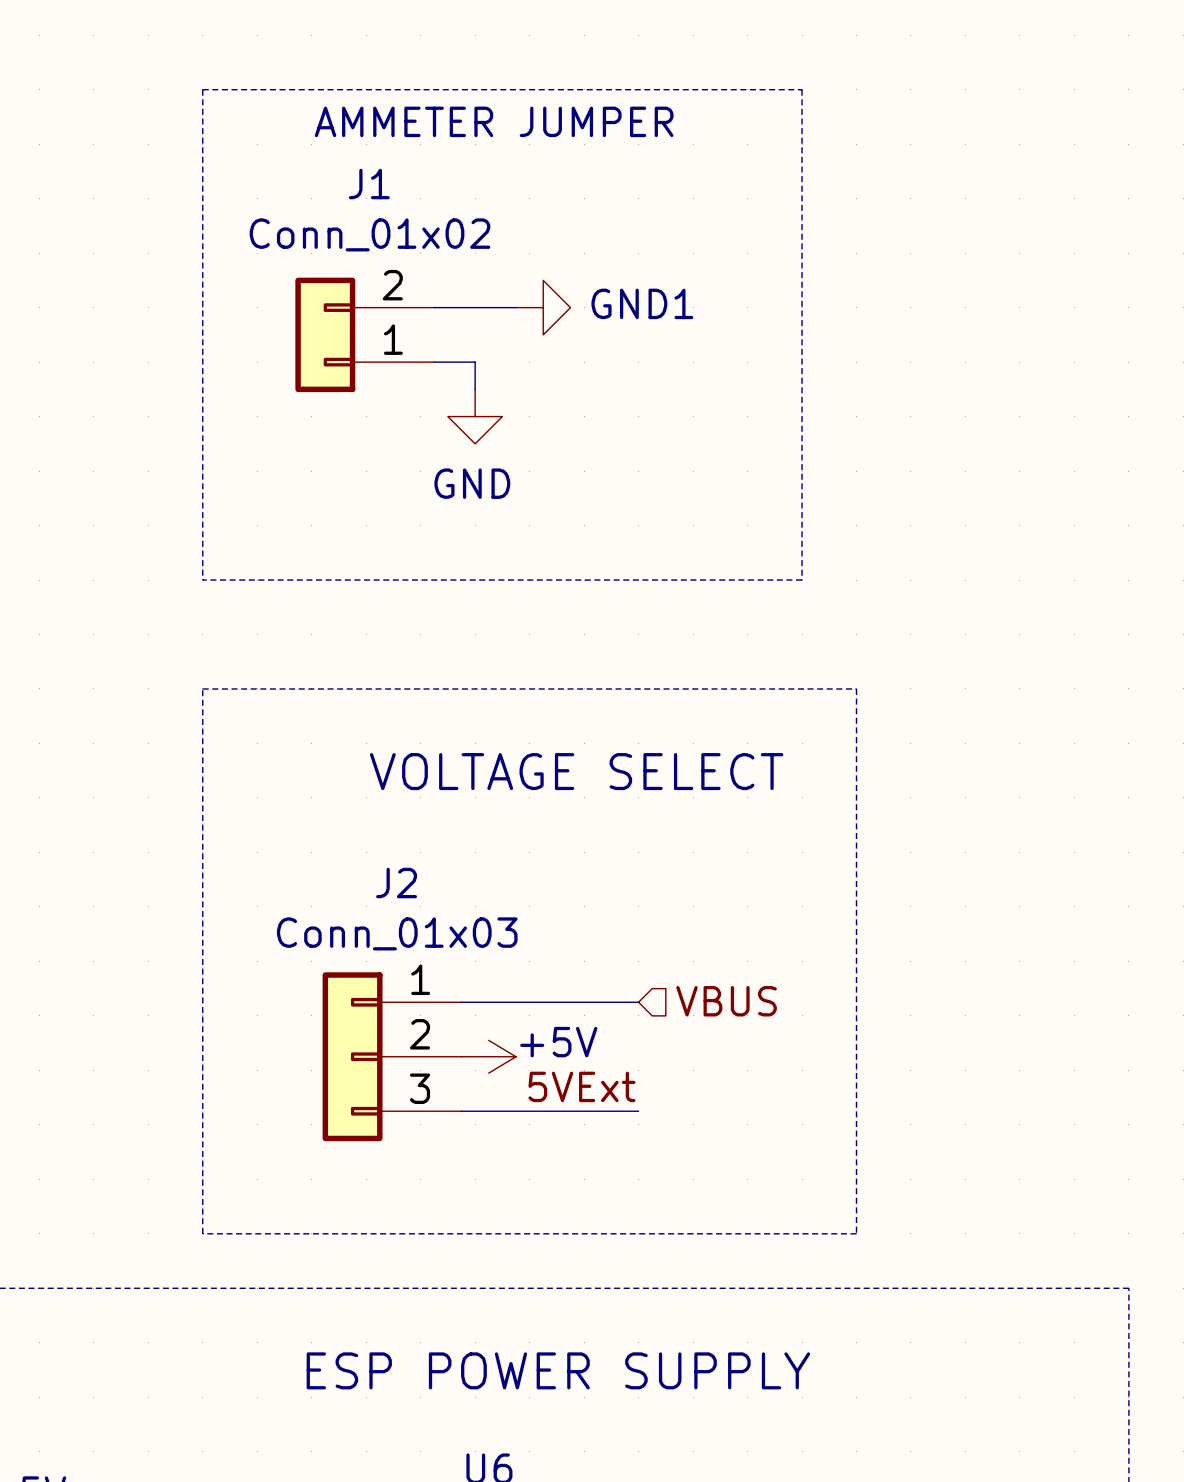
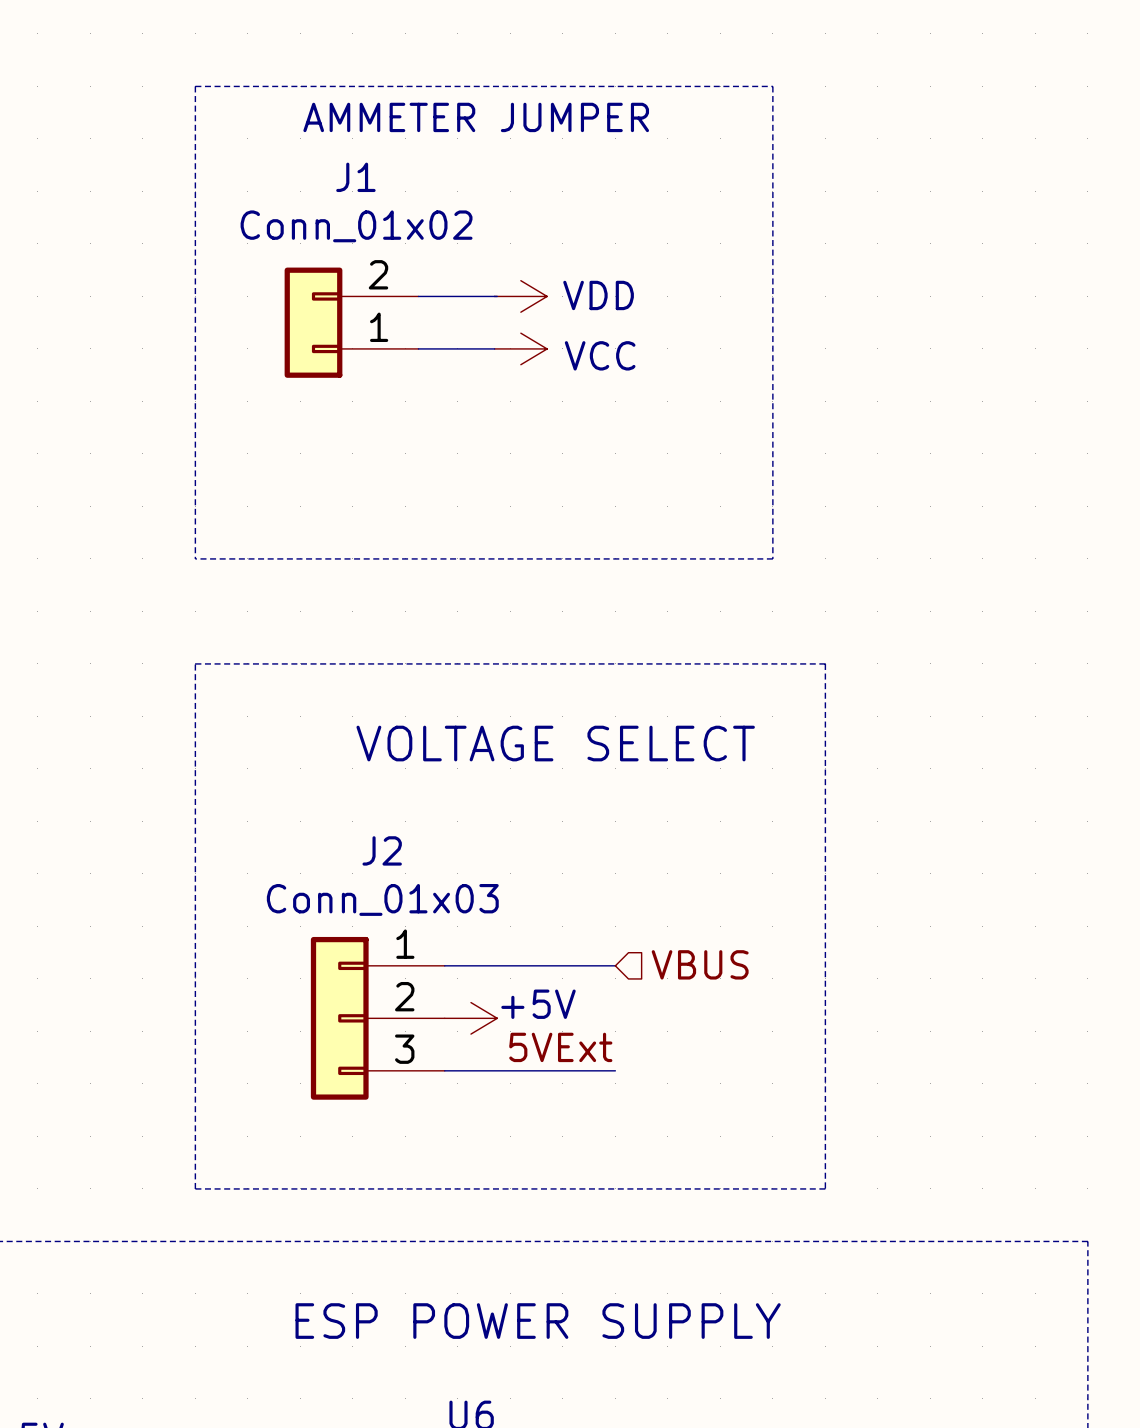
power symbol: GND1 (543, 307) -> VDD (520, 296)
wire: (475, 362) (475, 389) -> (457, 348) (494, 348)
power symbol: none -> VCC (520, 348)
power symbol: GND (475, 416) -> none

